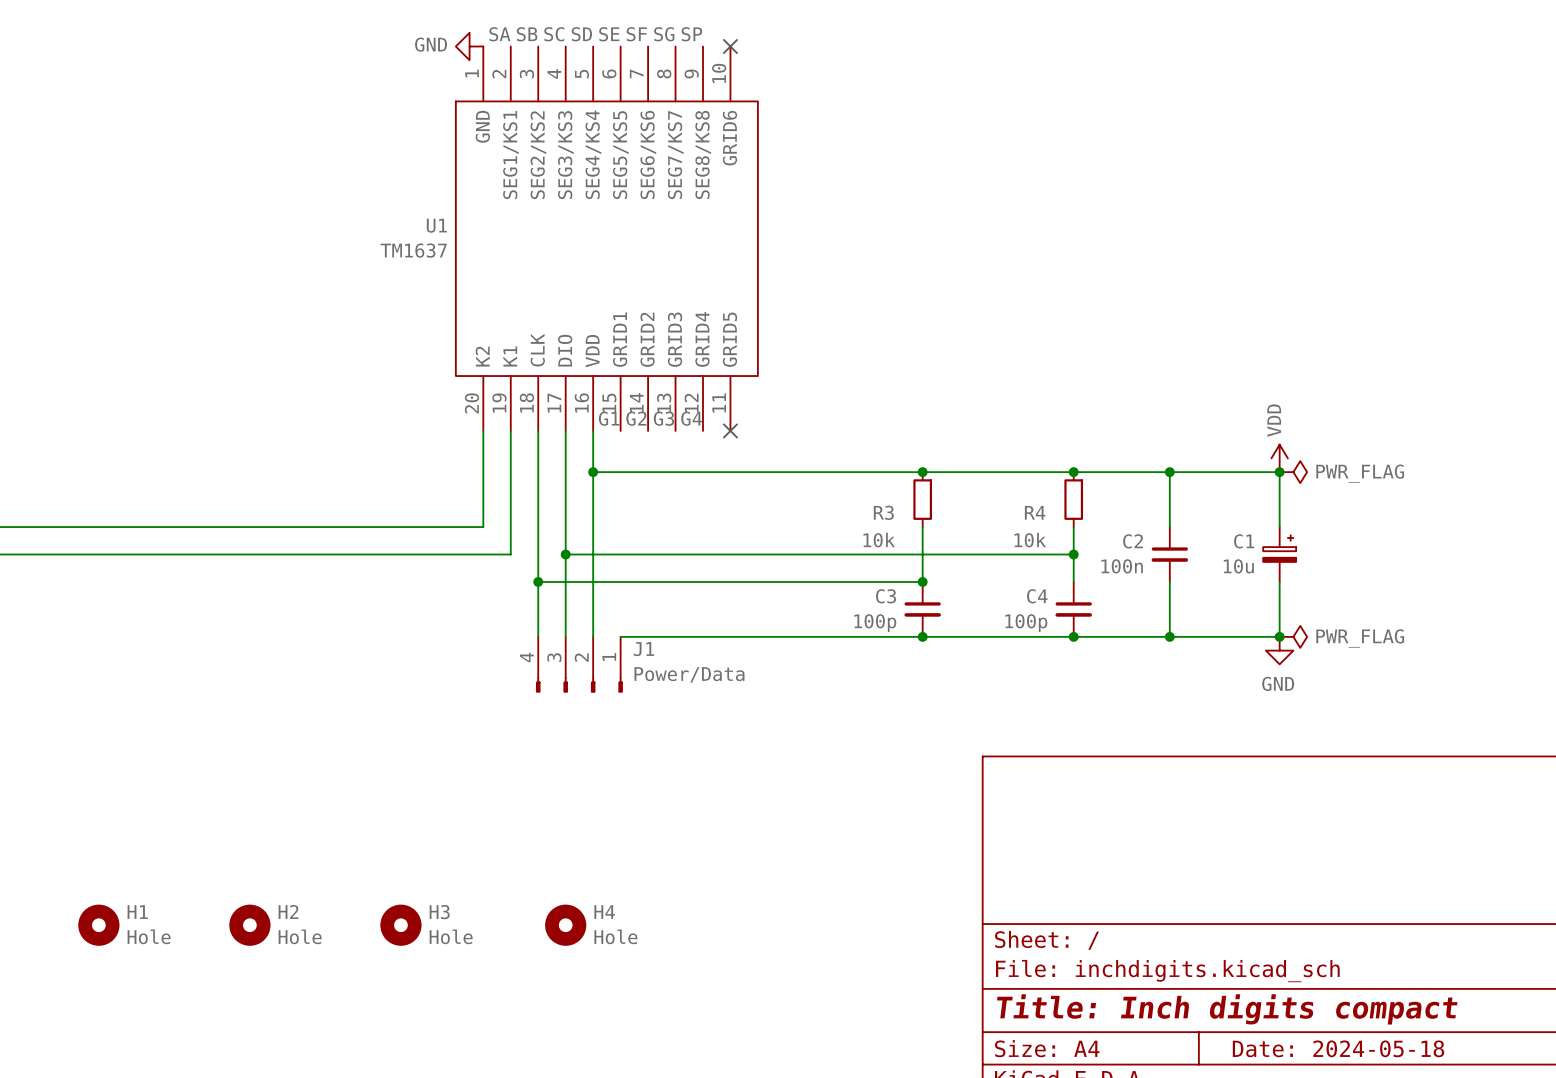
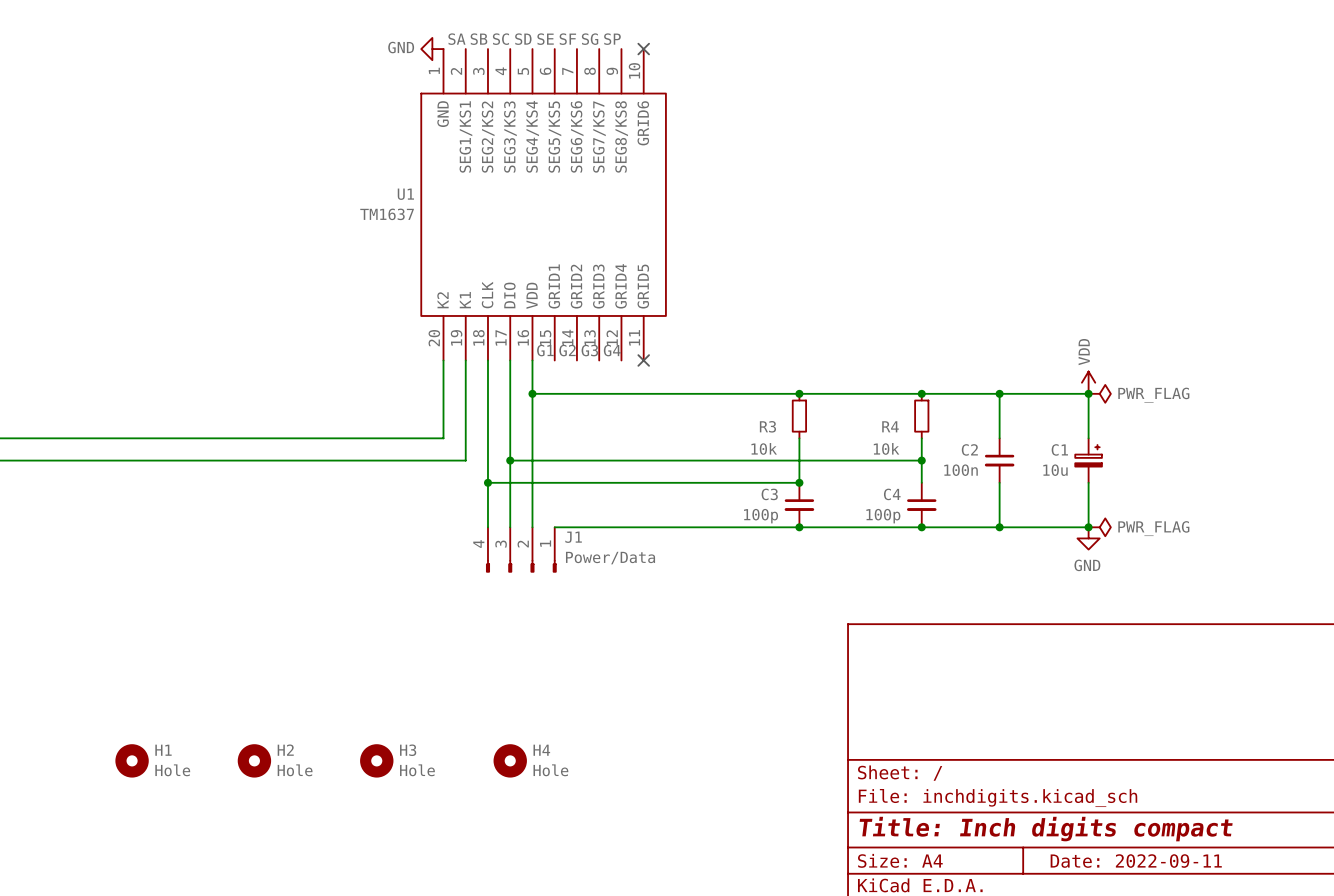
title block: Date: 2024-05-18 (1338, 1048) -> Date: 2022-09-11 (1136, 861)

